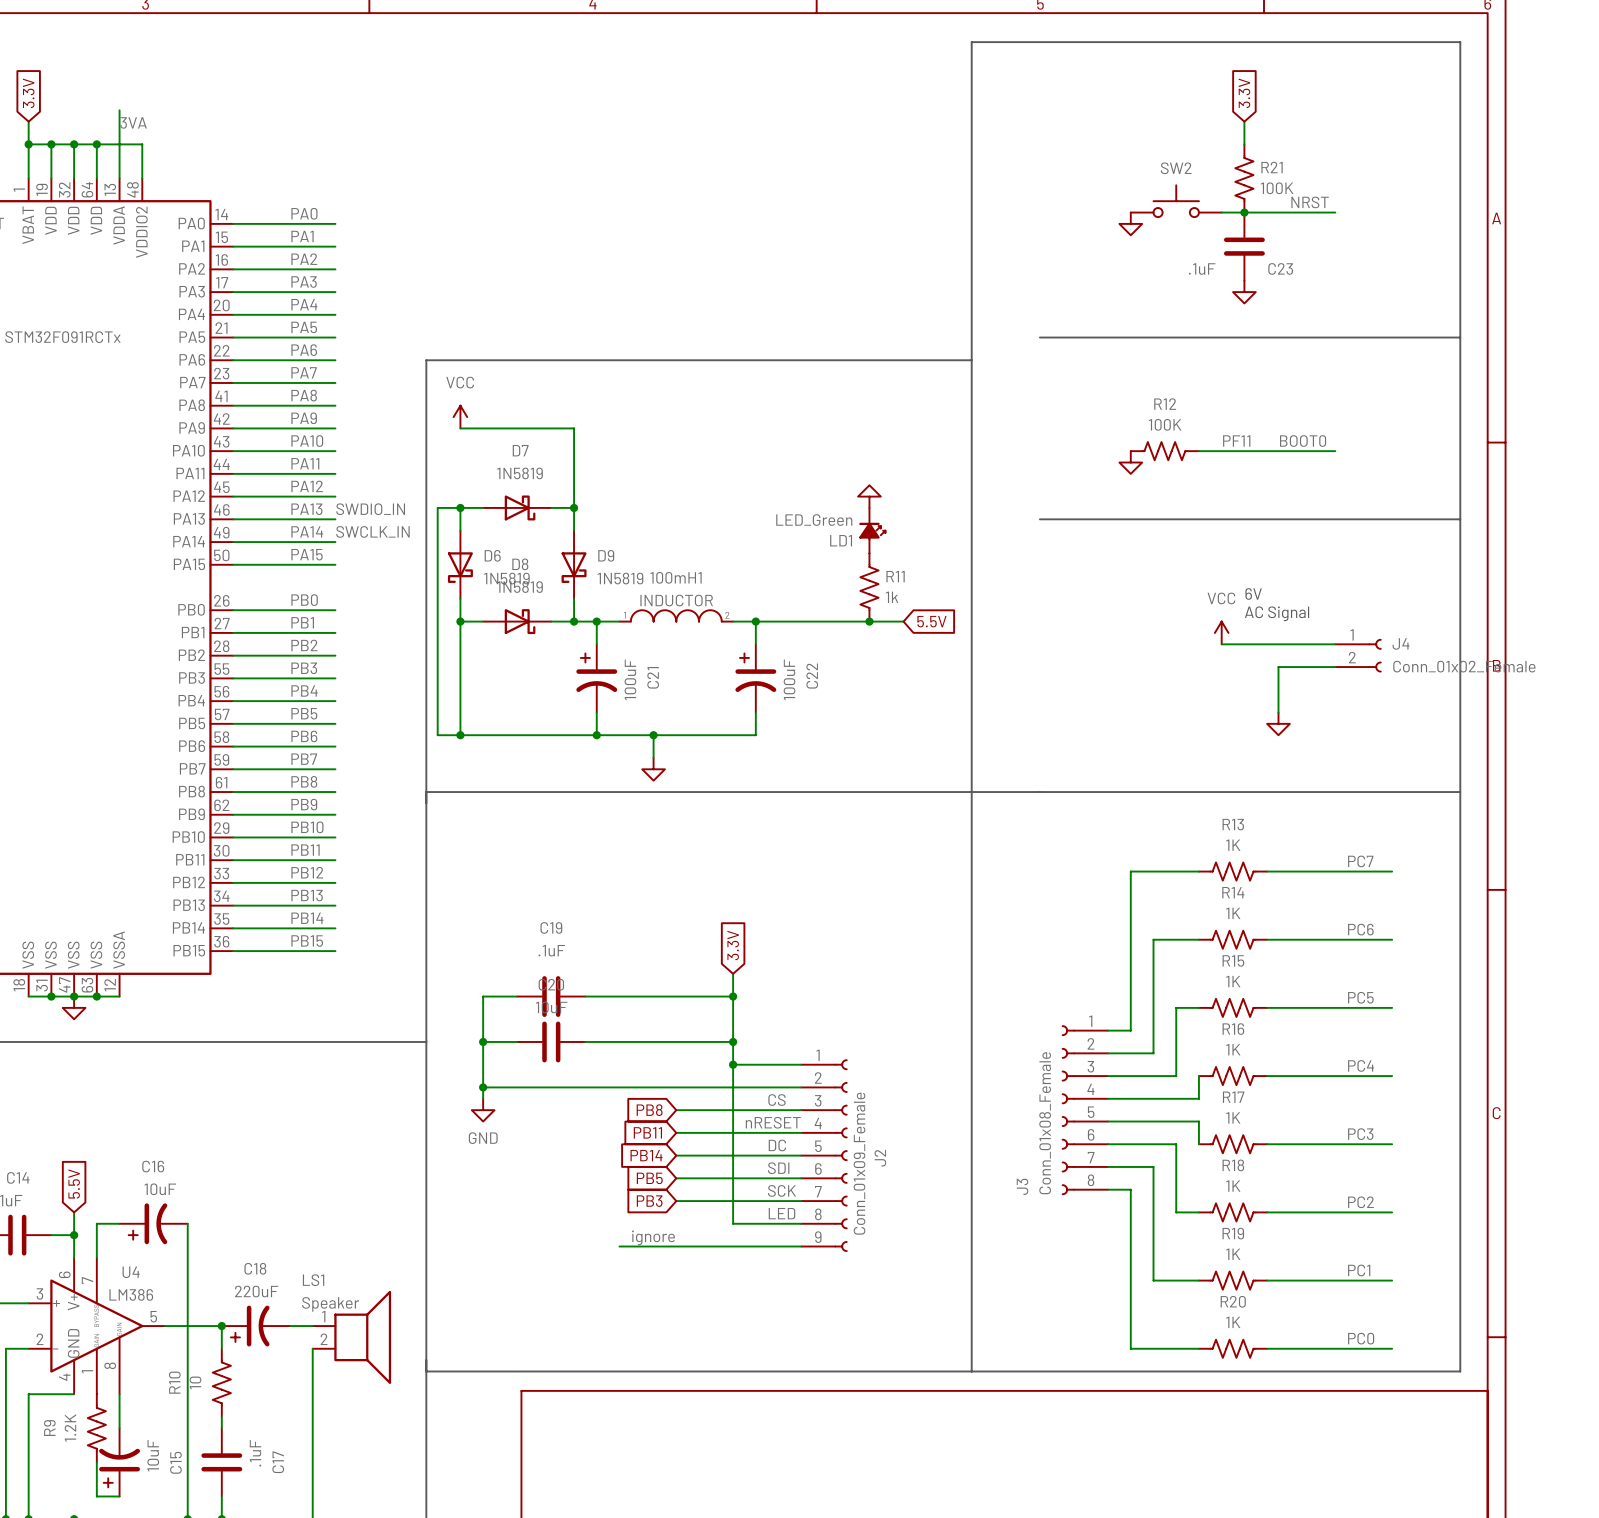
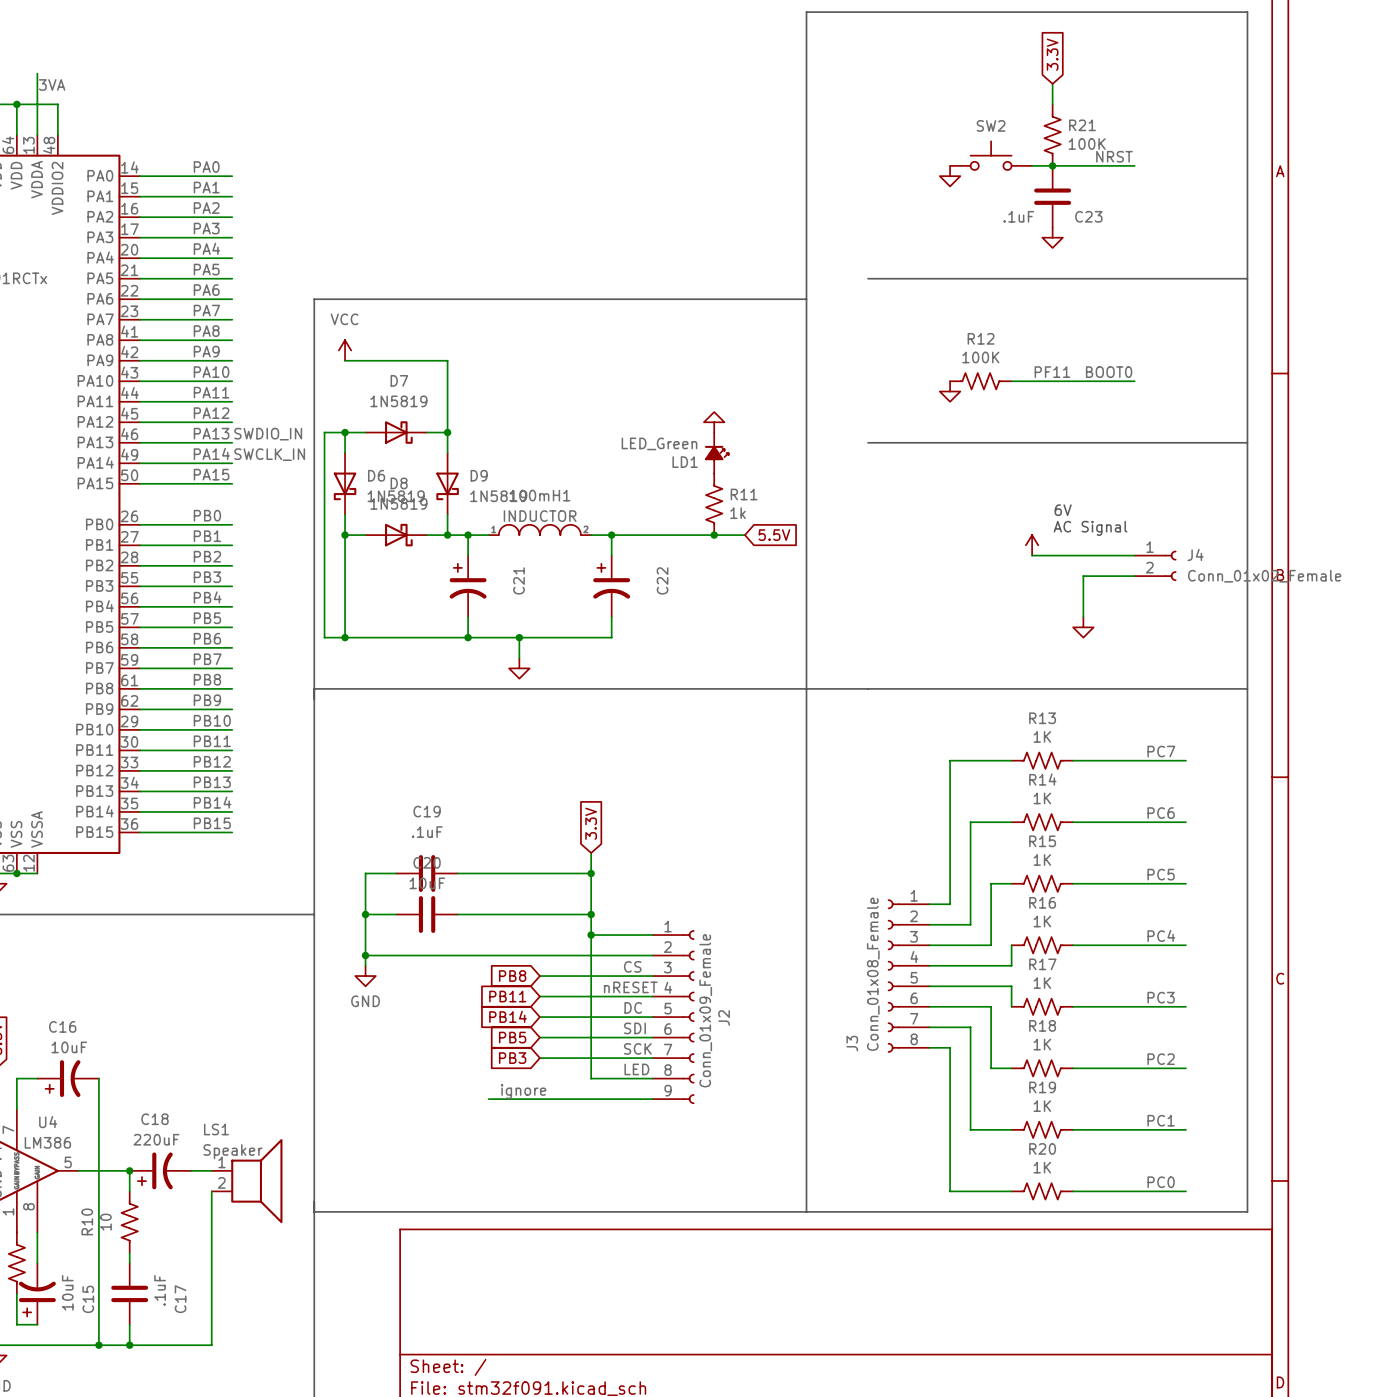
power symbol text: VCC (1221, 598) -> none
C21 value: 100uF (630, 679) -> none
C22 value: 100uF (789, 679) -> none

